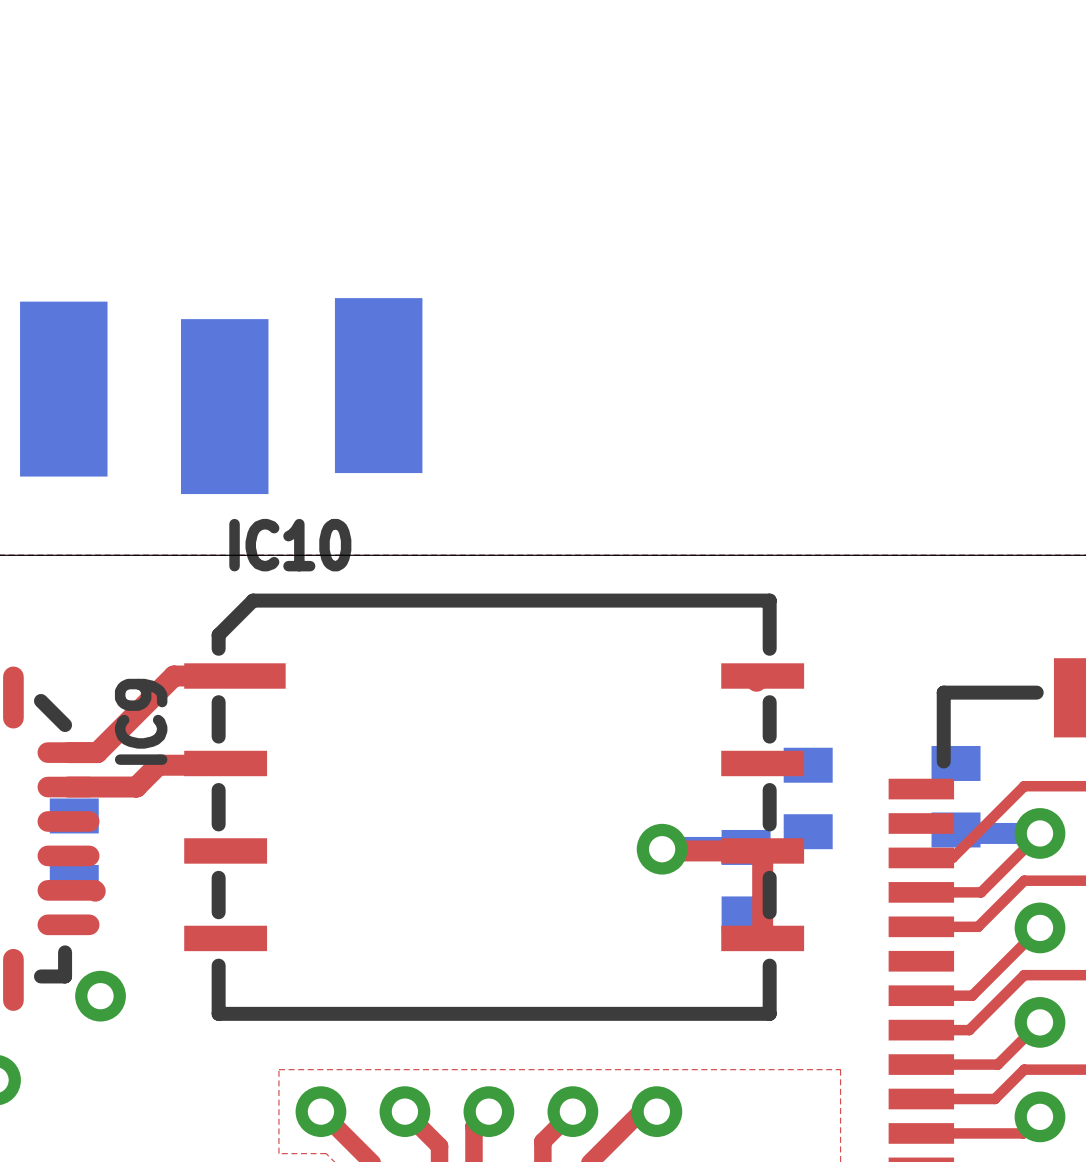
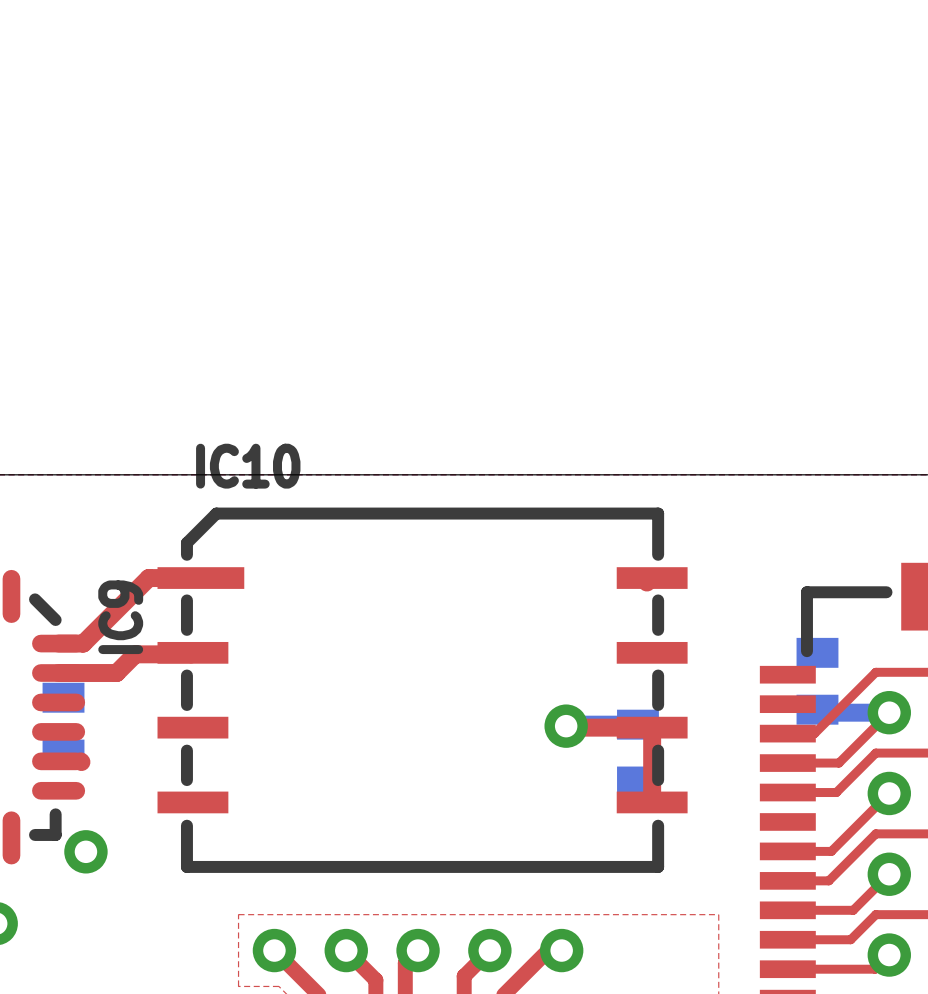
part: (378, 385) -> none
part: (63, 389) -> none
part: (224, 406) -> none
part: (808, 798) -> none

